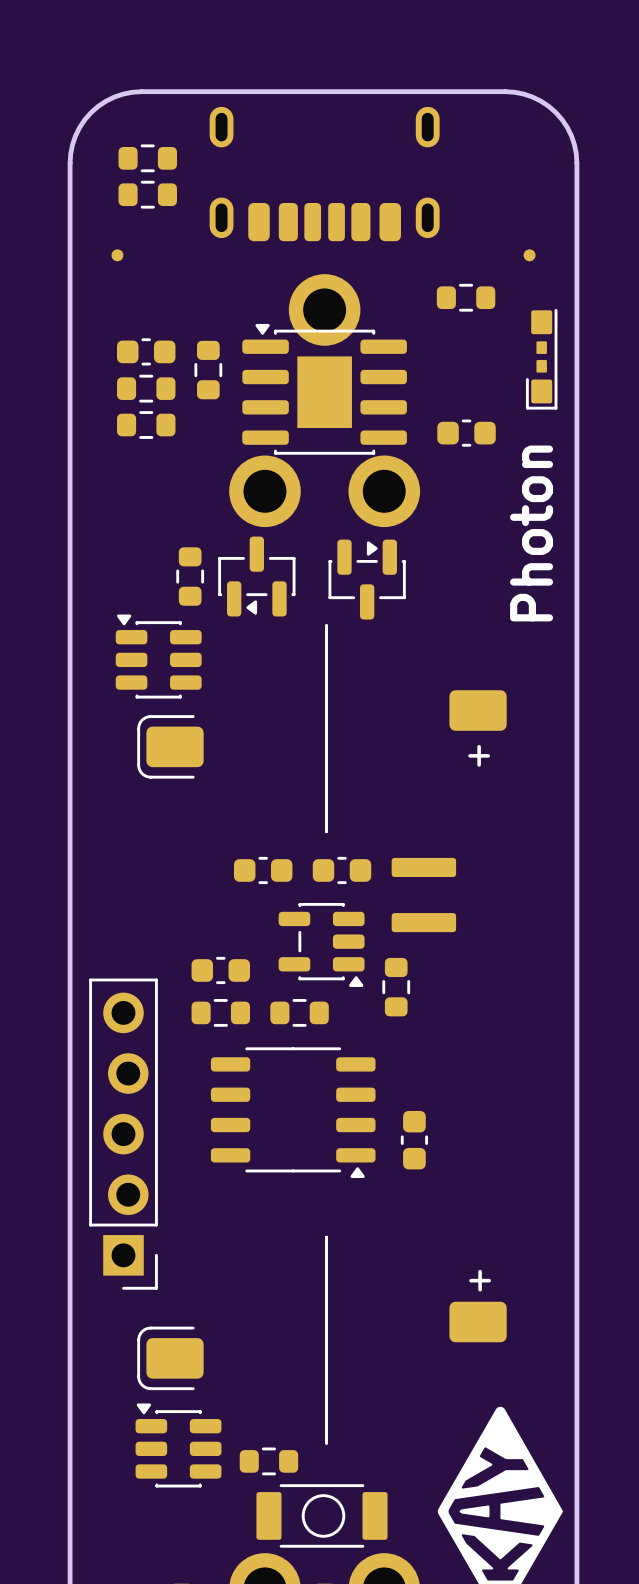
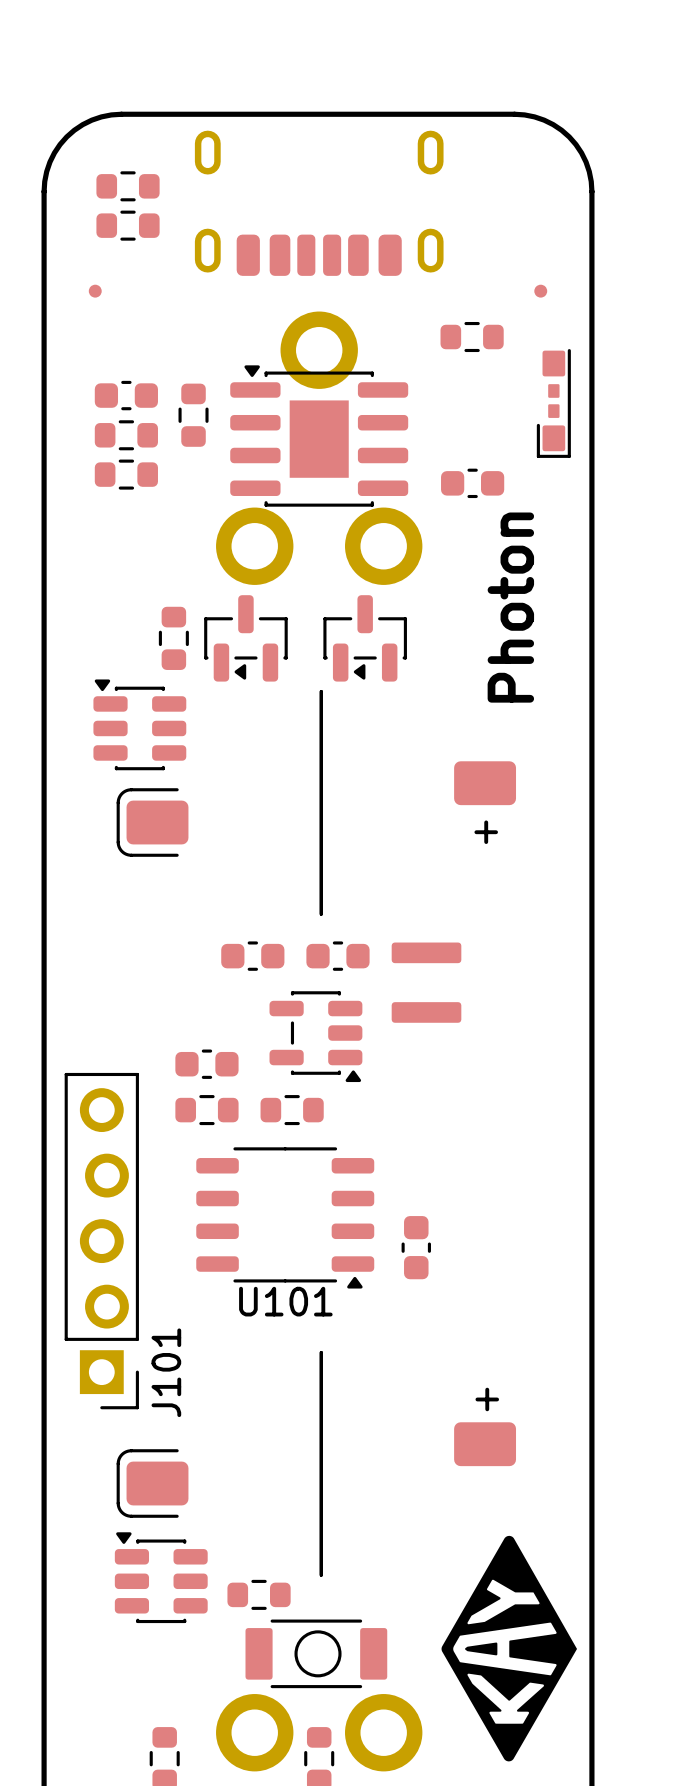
text position: Photon (531, 533) -> Photon (510, 607)
part rotation: 0° (367, 579) -> 180° (365, 638)
part: (396, 987) -> none
U101 name: none -> U101 (285, 1301)
J101 name: none -> J101 (166, 1372)

